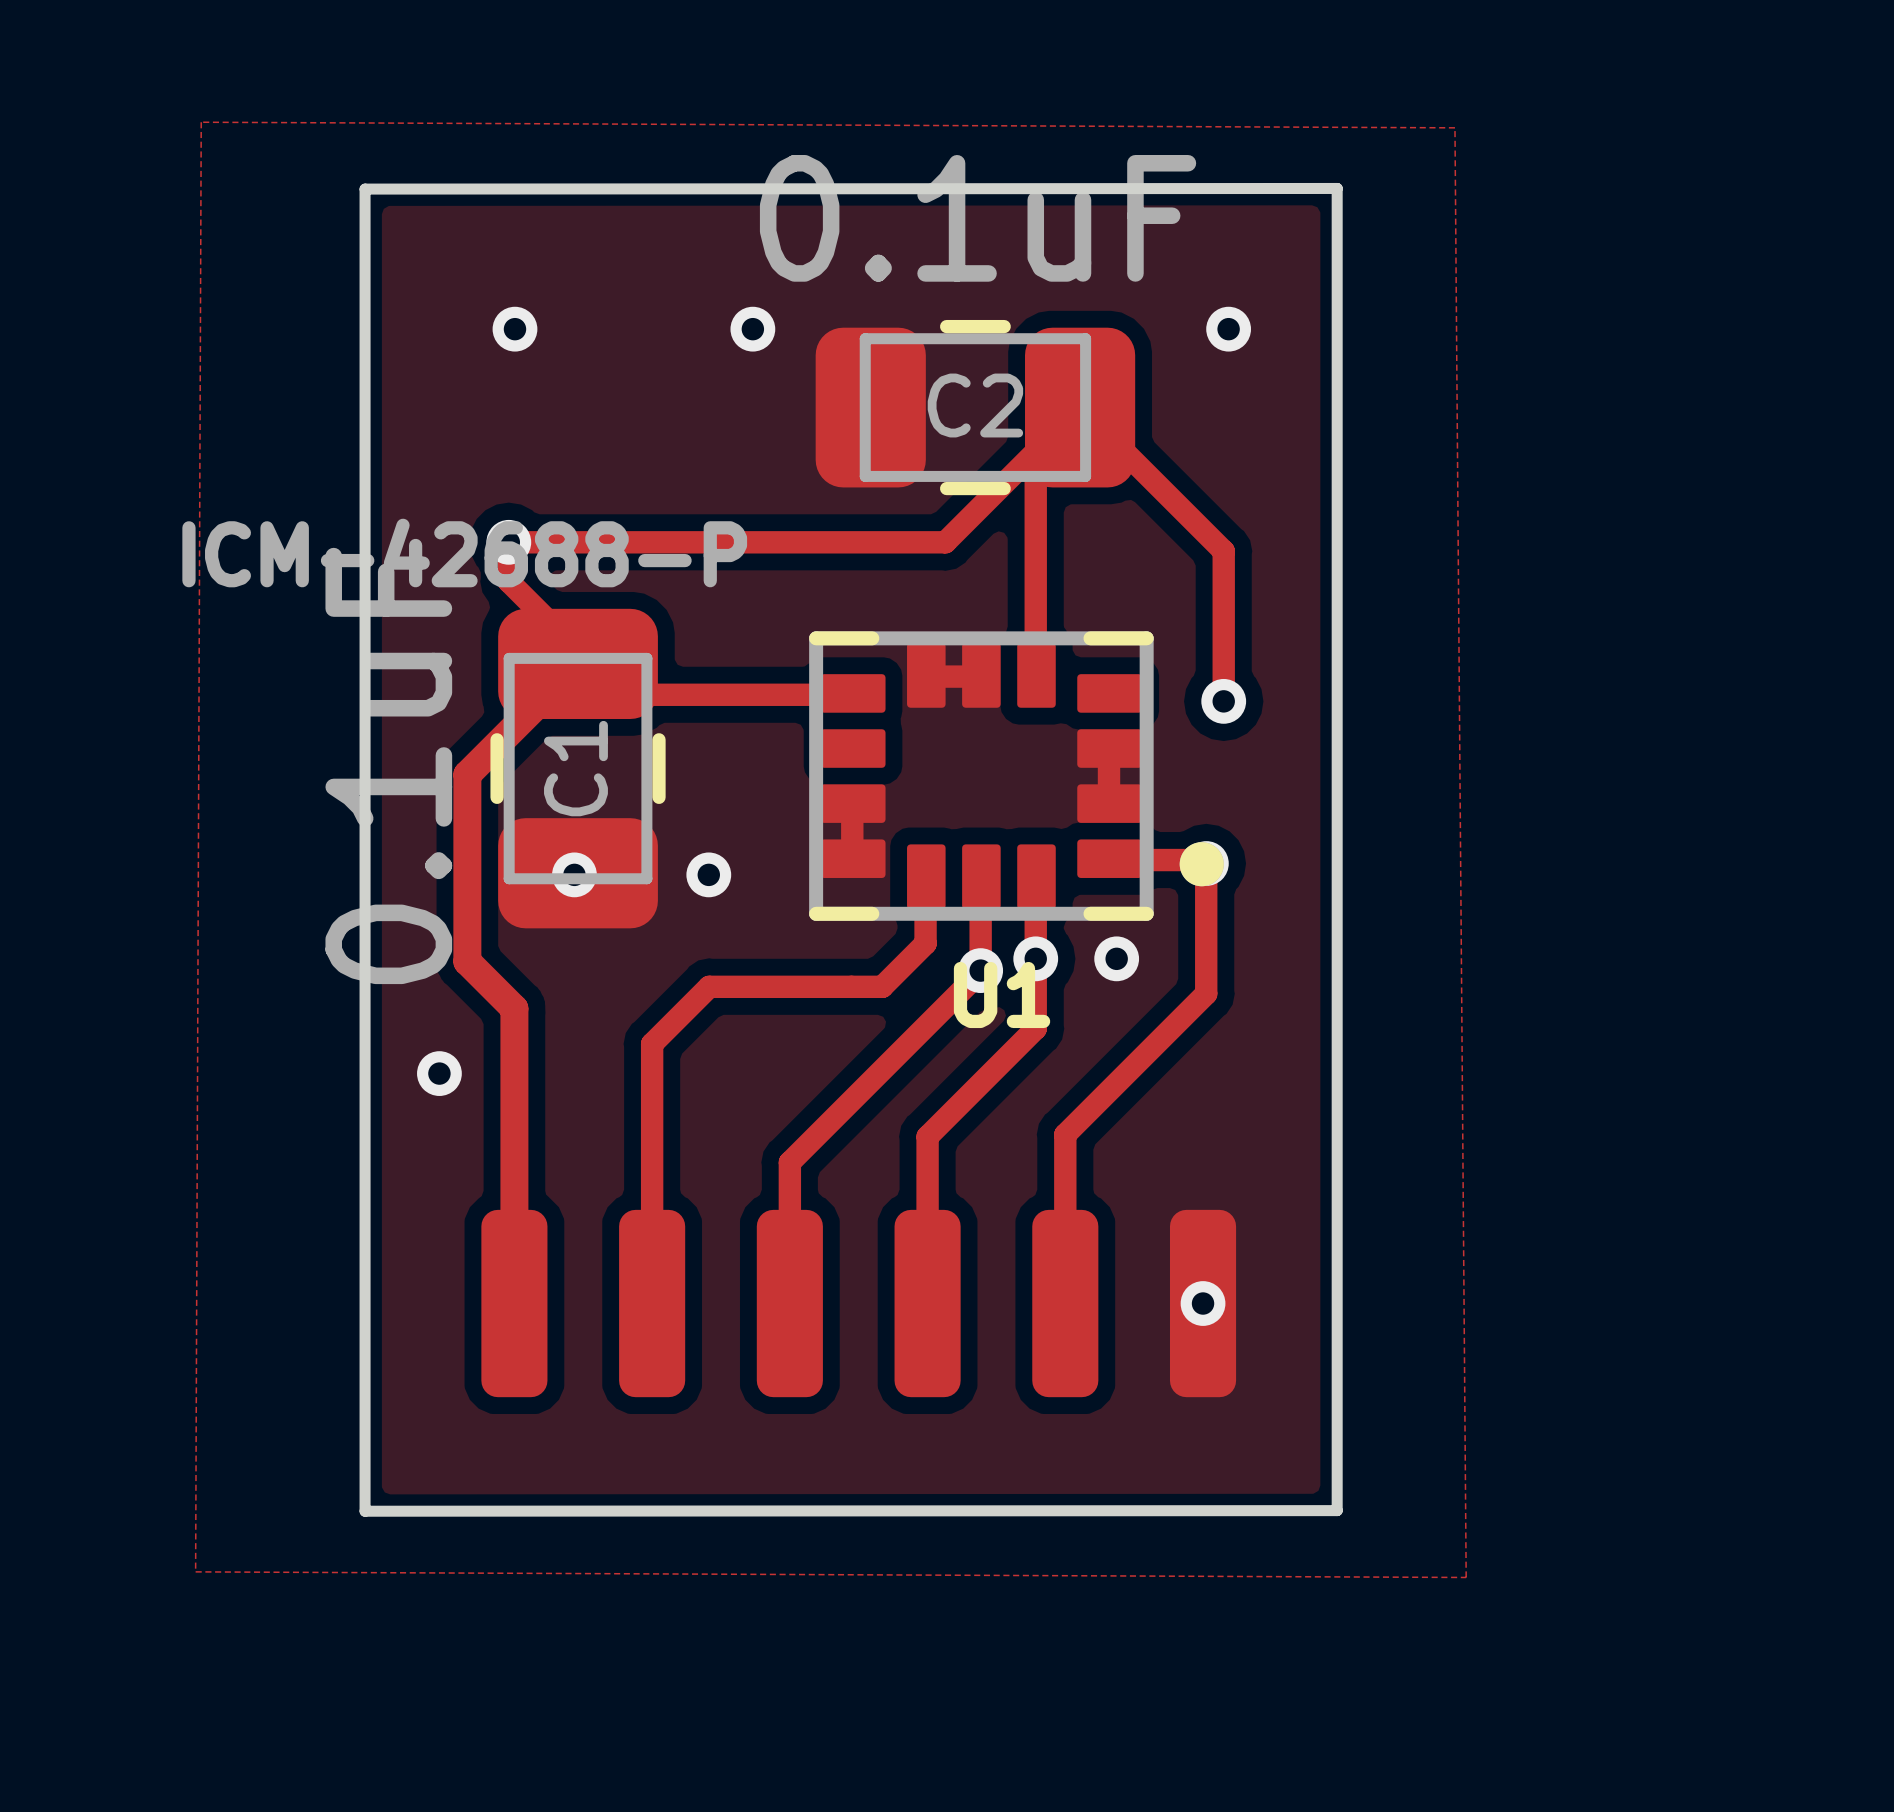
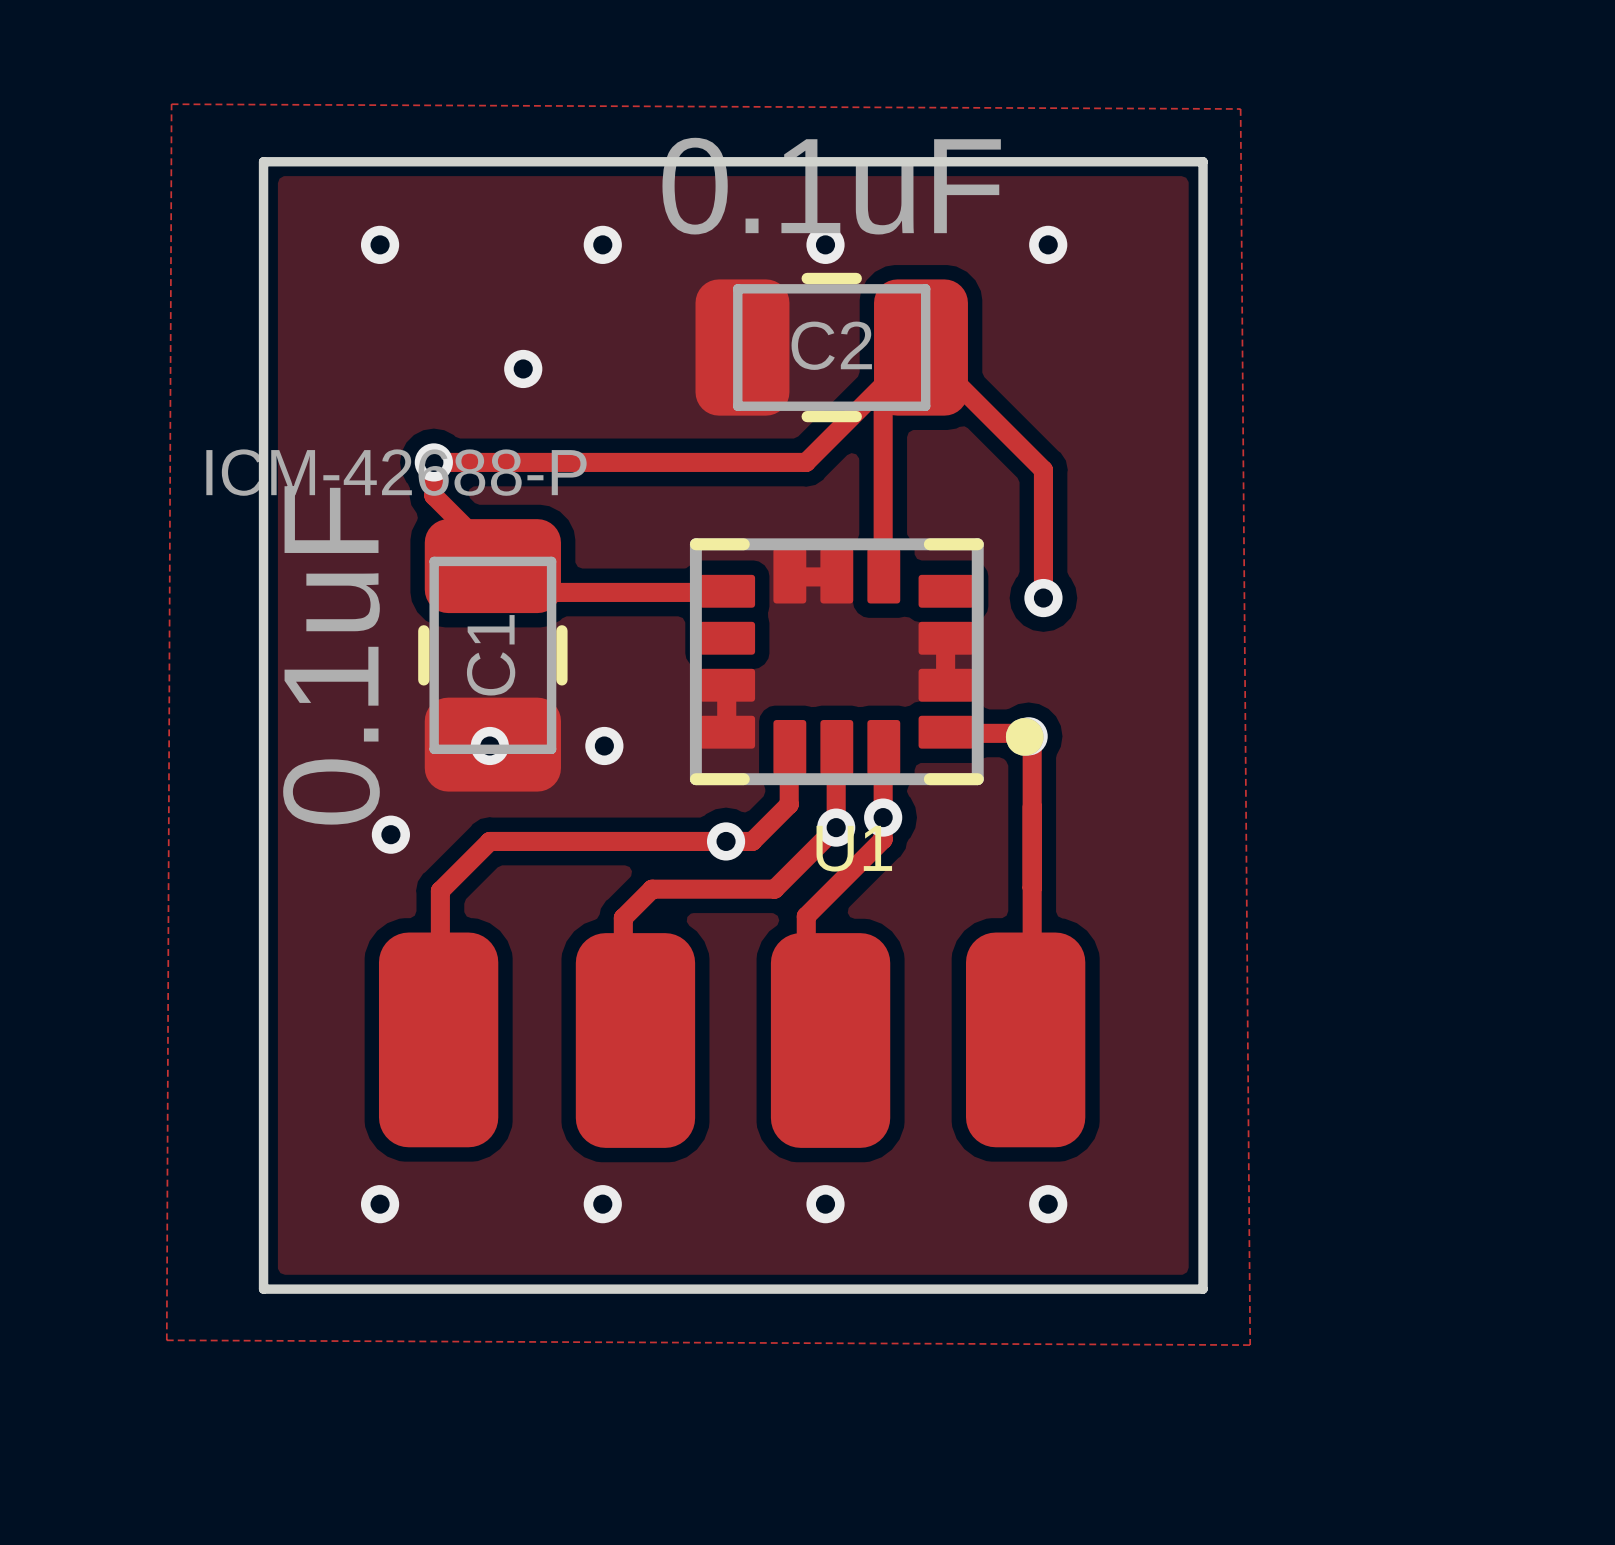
board edge: (365, 189) (365, 1511) (1337, 1510) (1337, 188) (365, 189) -> (263, 161) (263, 1289) (1203, 1289) (1203, 161) (263, 161)
via: none -> (380, 244)
via: none -> (825, 244)
via: (514, 329) -> none
via position: (752, 329) -> (602, 244)
via position: (1228, 329) -> (1048, 244)
via: none -> (523, 368)
track: (578, 663) (467, 774) (467, 961) (514, 1008) (514, 1303) -> none
track: (1210, 867) (1206, 871) (1206, 993) (1065, 1134) (1065, 1303) -> (1032, 739) (1032, 997) (989, 1040)
via: (1116, 958) -> none
track: (980, 971) (789, 1162) (789, 1303) -> (836, 827) (774, 889) (652, 889) (623, 917) (623, 1040)
track: (1035, 984) (1035, 1028) (927, 1136) (927, 1303) -> (883, 839) (806, 916) (806, 1040)
track: (709, 986) (652, 1043) (652, 1303) -> (604, 841) (489, 841) (440, 890) (440, 1040)
via: none -> (726, 841)
via position: (439, 1073) -> (390, 834)
part: none -> (438, 1039)
part: none -> (1025, 1039)
part: none -> (635, 1040)
part: none -> (830, 1040)
part: (514, 1303) -> none
part: (652, 1303) -> none
part: (789, 1303) -> none
part: (927, 1303) -> none
part: (1065, 1303) -> none
part: (1203, 1303) -> none
via position: (1203, 1303) -> (1048, 1204)
via: none -> (380, 1204)
via: none -> (602, 1204)
via: none -> (825, 1204)

